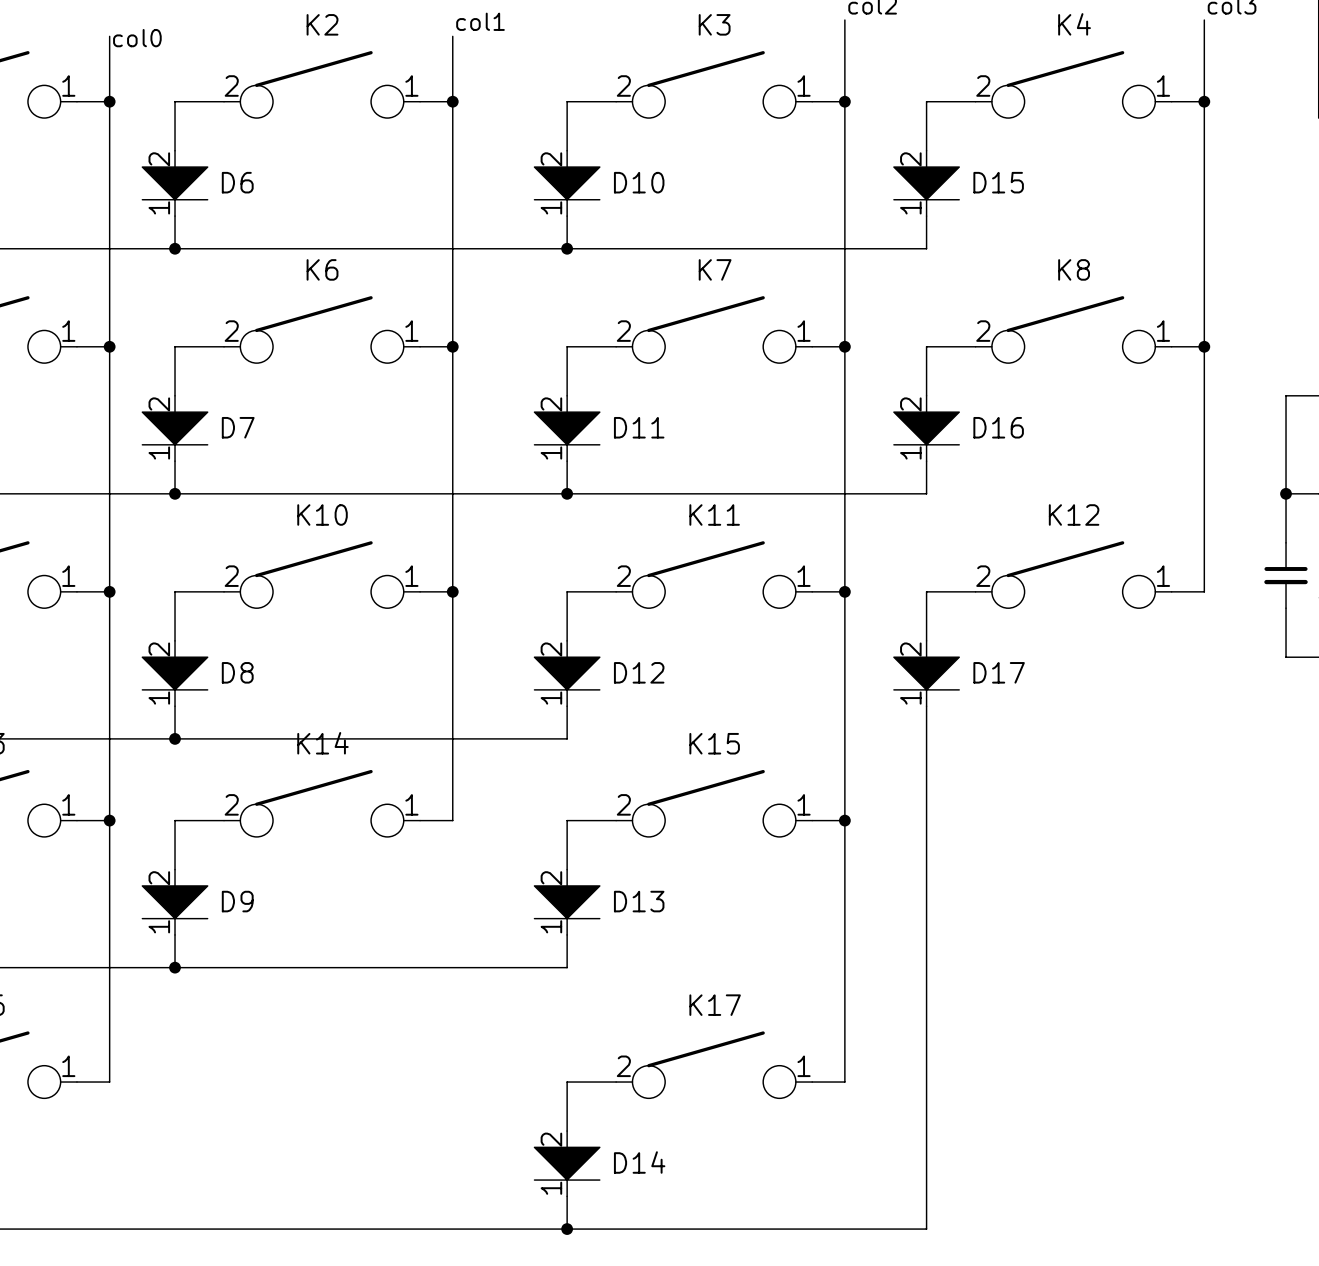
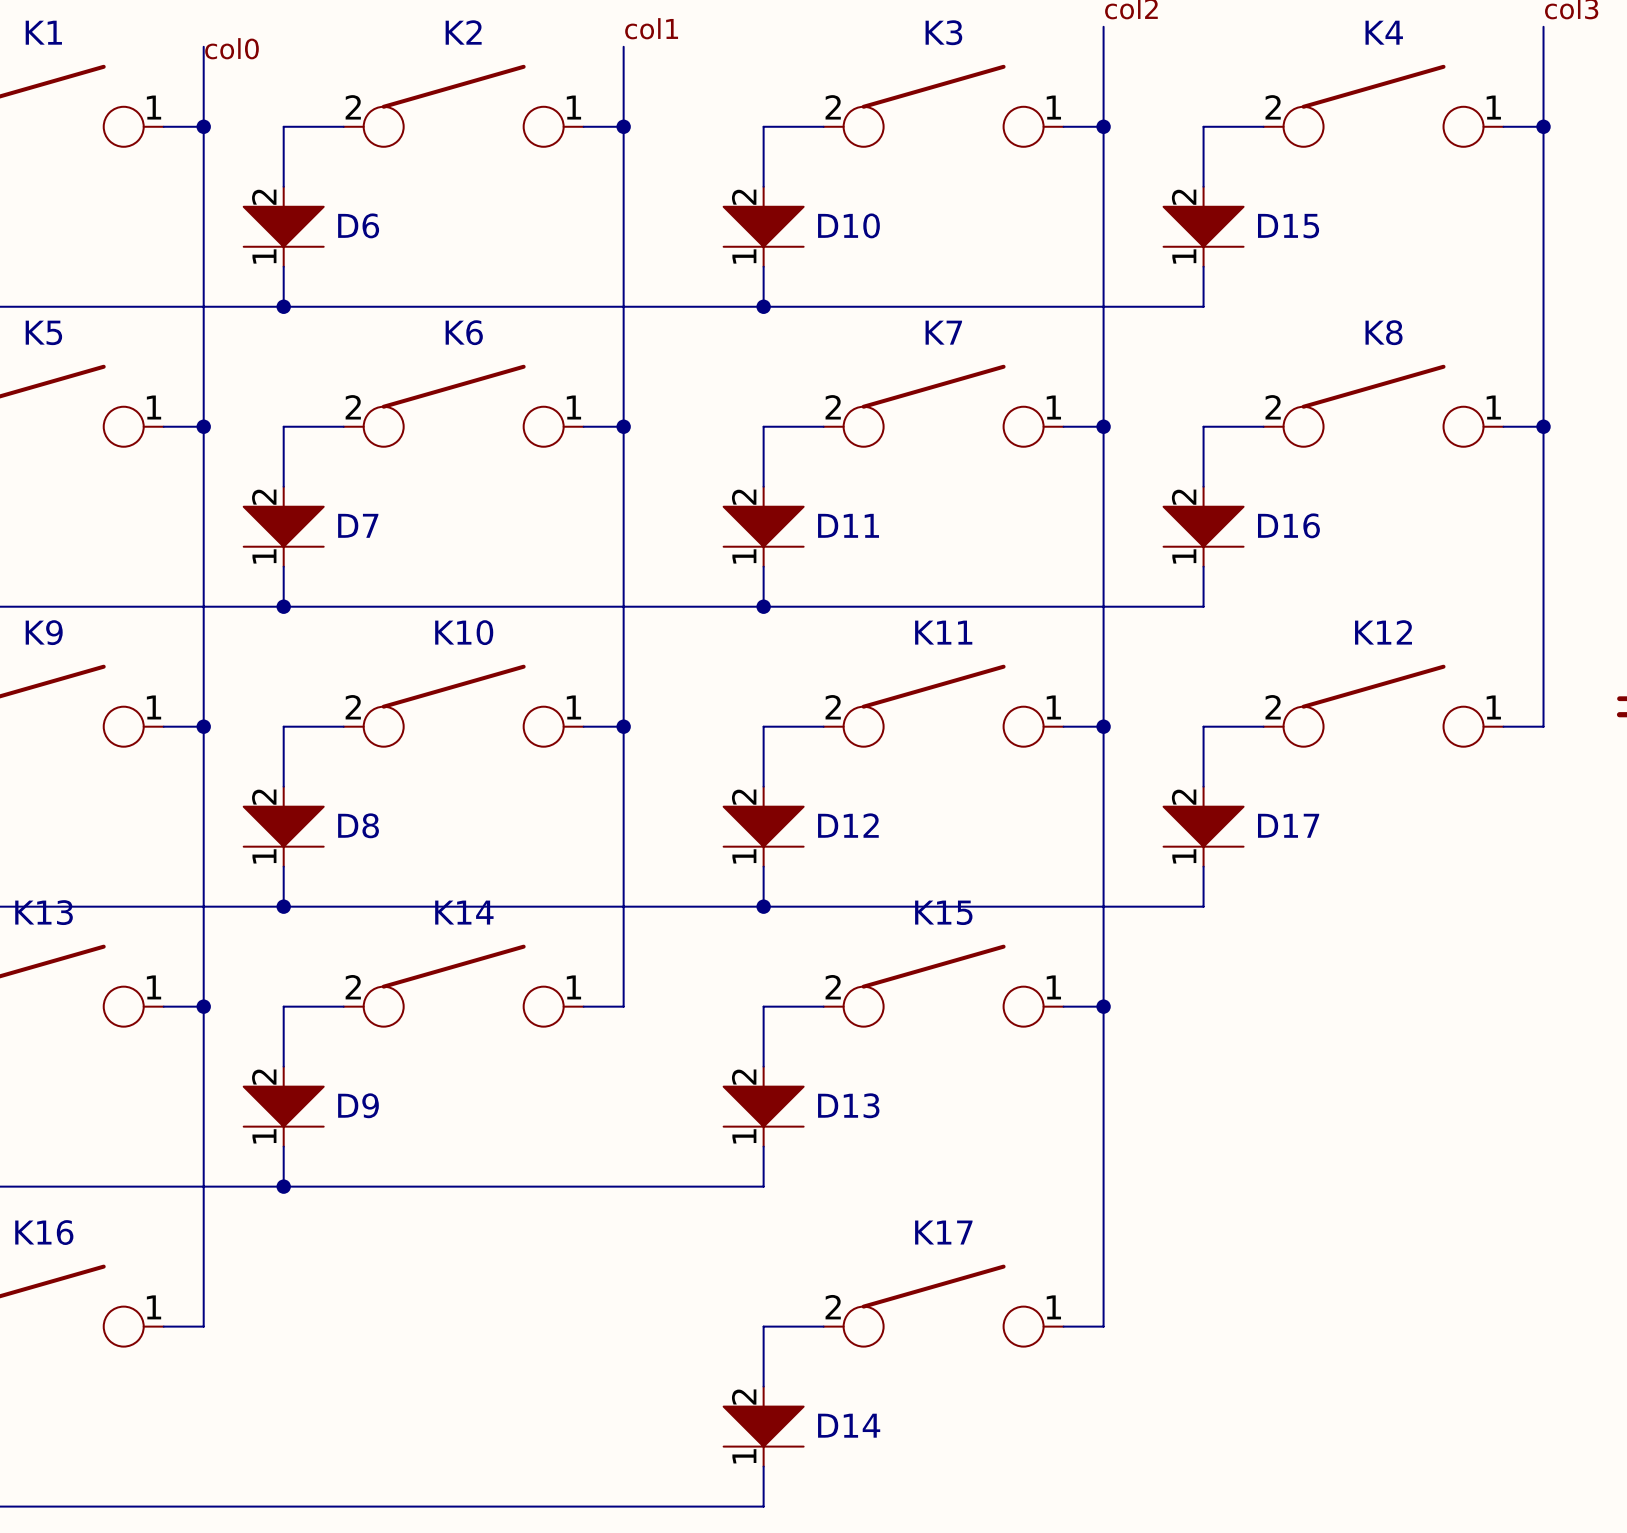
junction: none -> (763, 906)
wire: (926, 738) (926, 1229) (567, 1229) -> (1203, 906) (763, 906)
junction: (567, 1229) -> none

